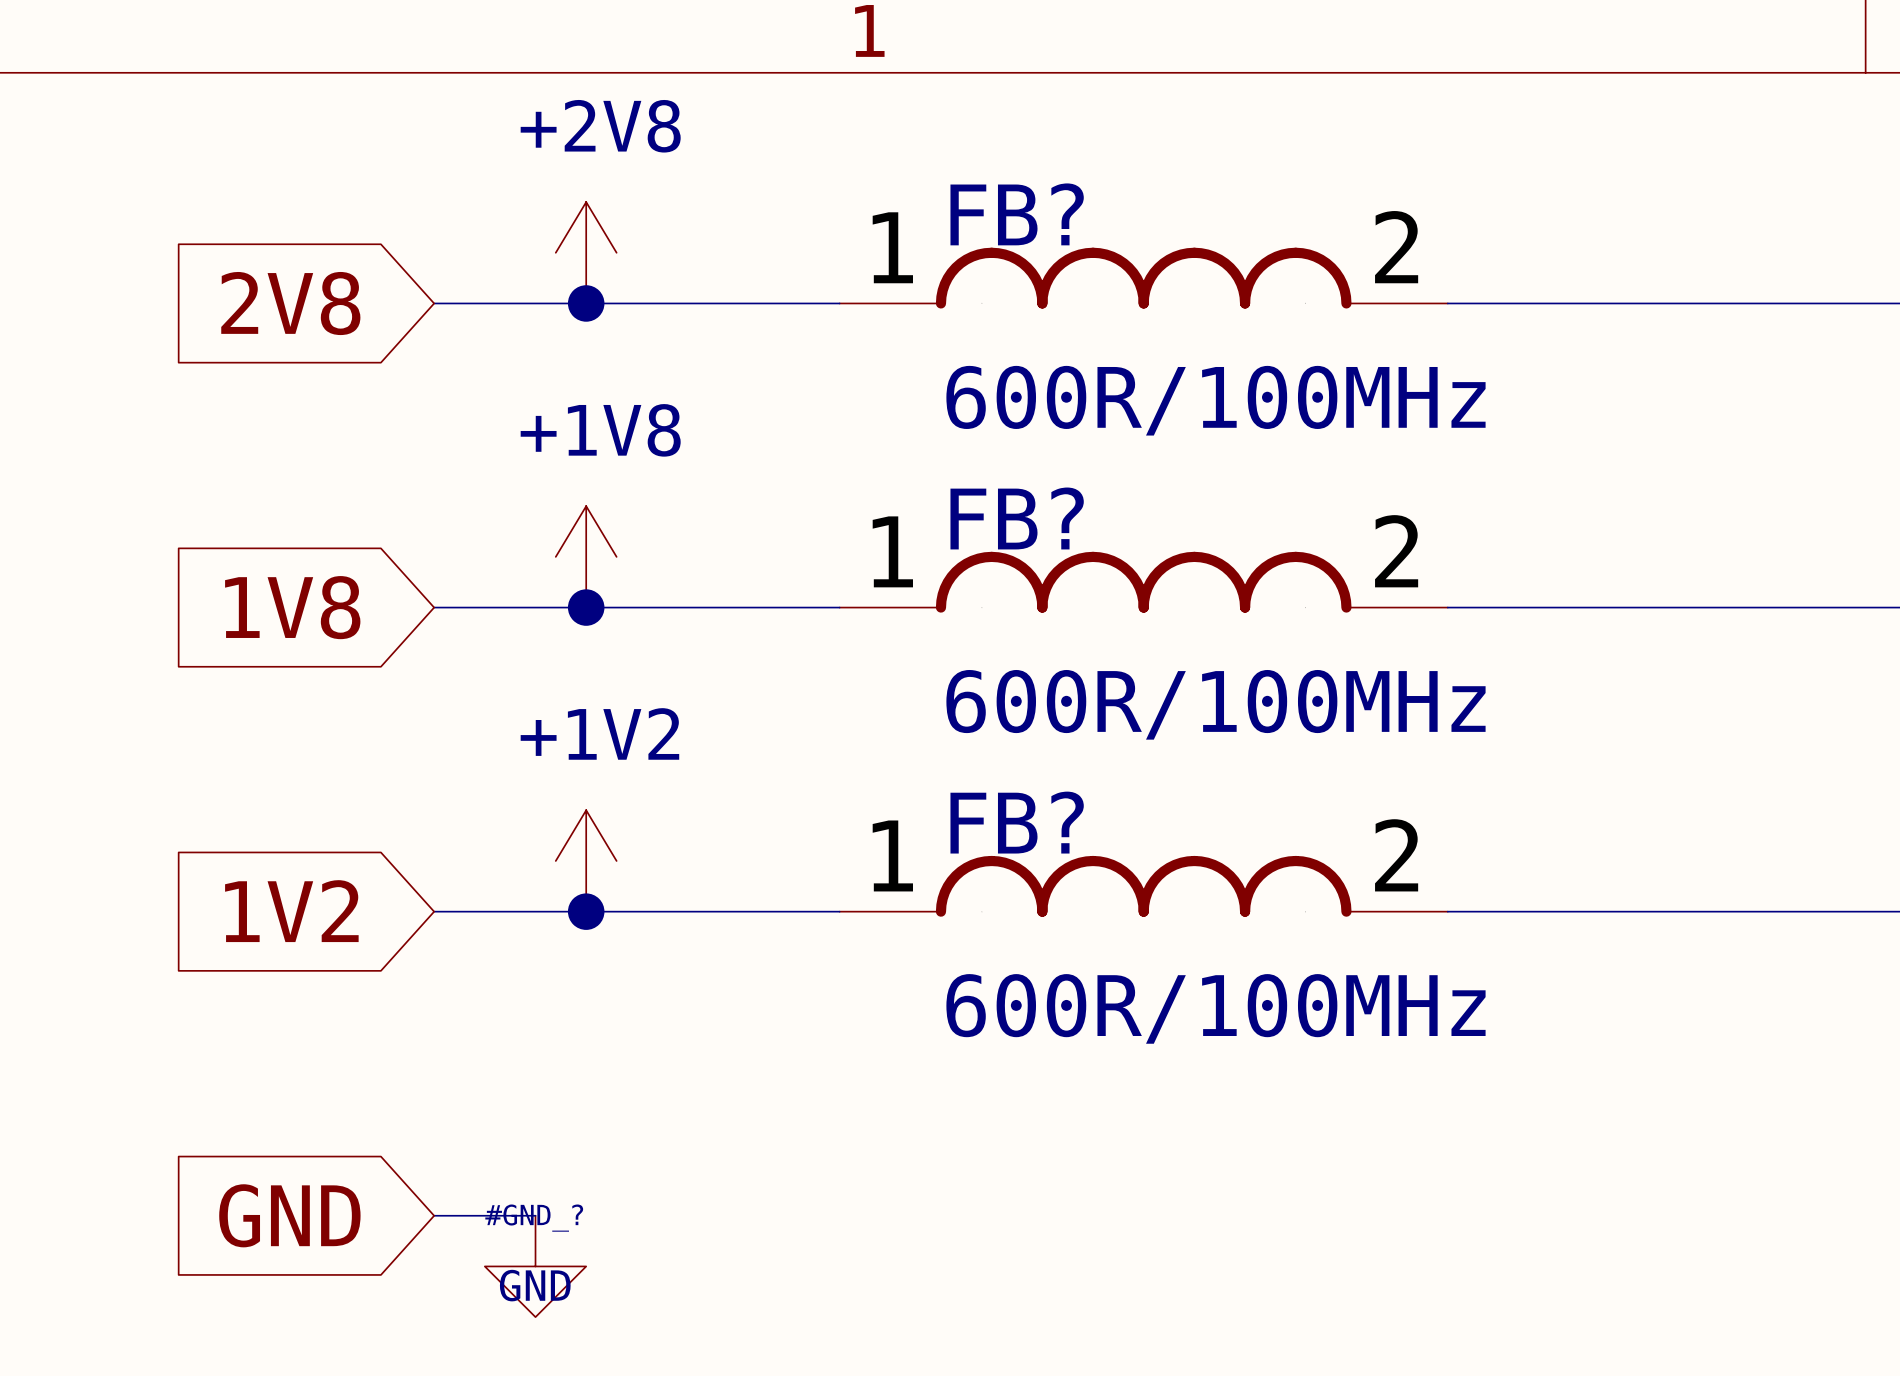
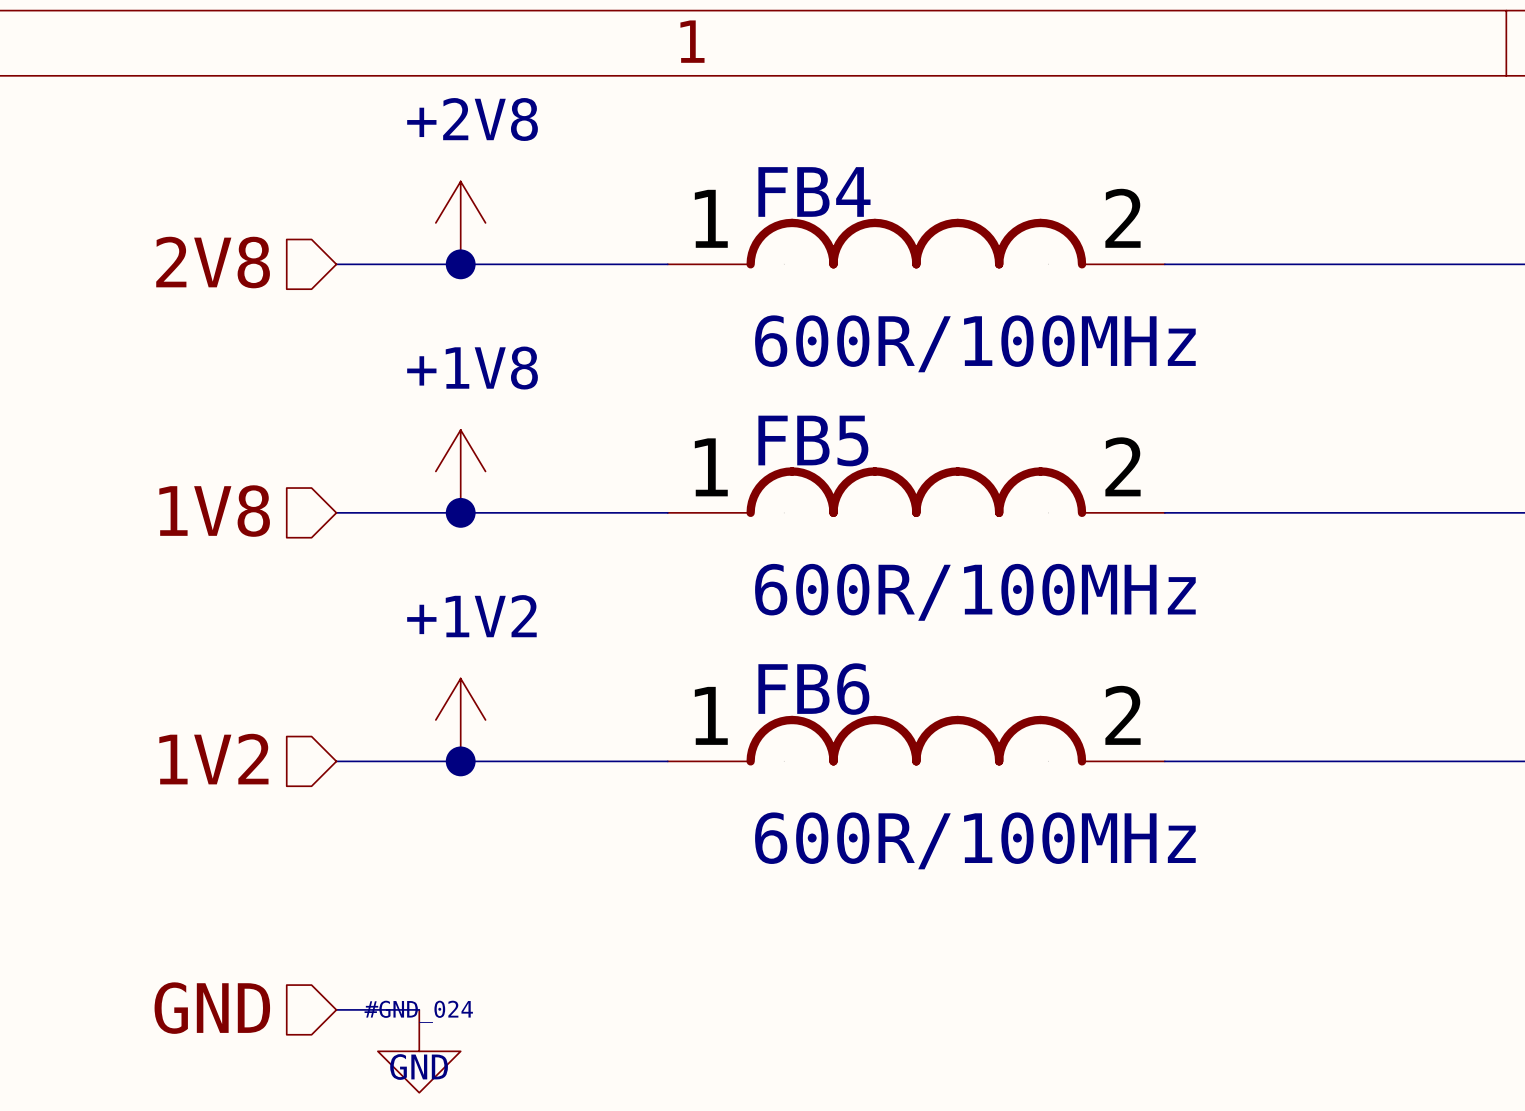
FB? name: FB? (1017, 214) -> FB4 (814, 191)
hierarchical label: none -> 2V8 (213, 262)
global label: 2V8 (290, 303) -> none
FB? name: FB? (1017, 518) -> FB5 (813, 441)
hierarchical label: none -> 1V8 (214, 511)
global label: 1V8 (292, 607) -> none
FB? name: FB? (1017, 822) -> FB6 (813, 689)
hierarchical label: none -> 1V2 (213, 759)
global label: 1V2 (291, 911) -> none
hierarchical label: none -> GND (212, 1008)
global label: GND (289, 1215) -> none
#GND_? name: #GND_? (534, 1218) -> #GND_024 (418, 1011)

